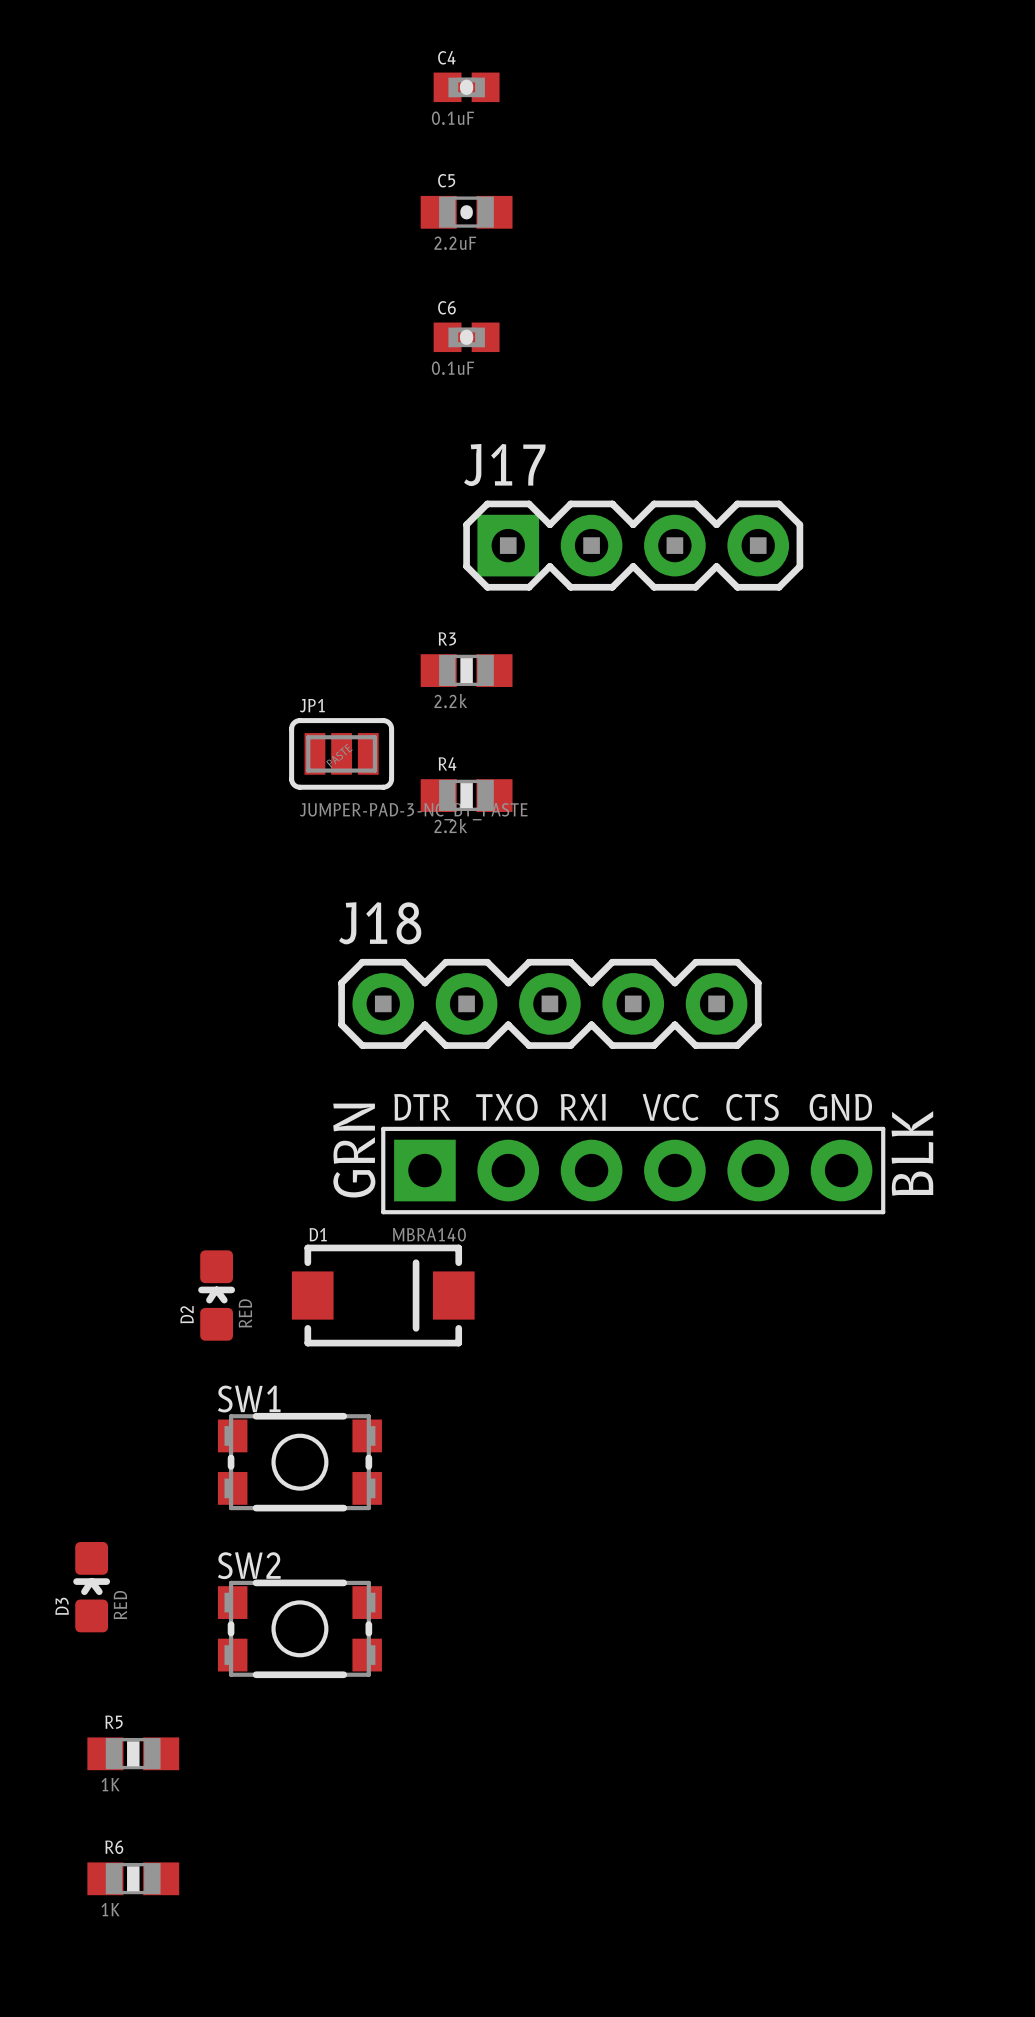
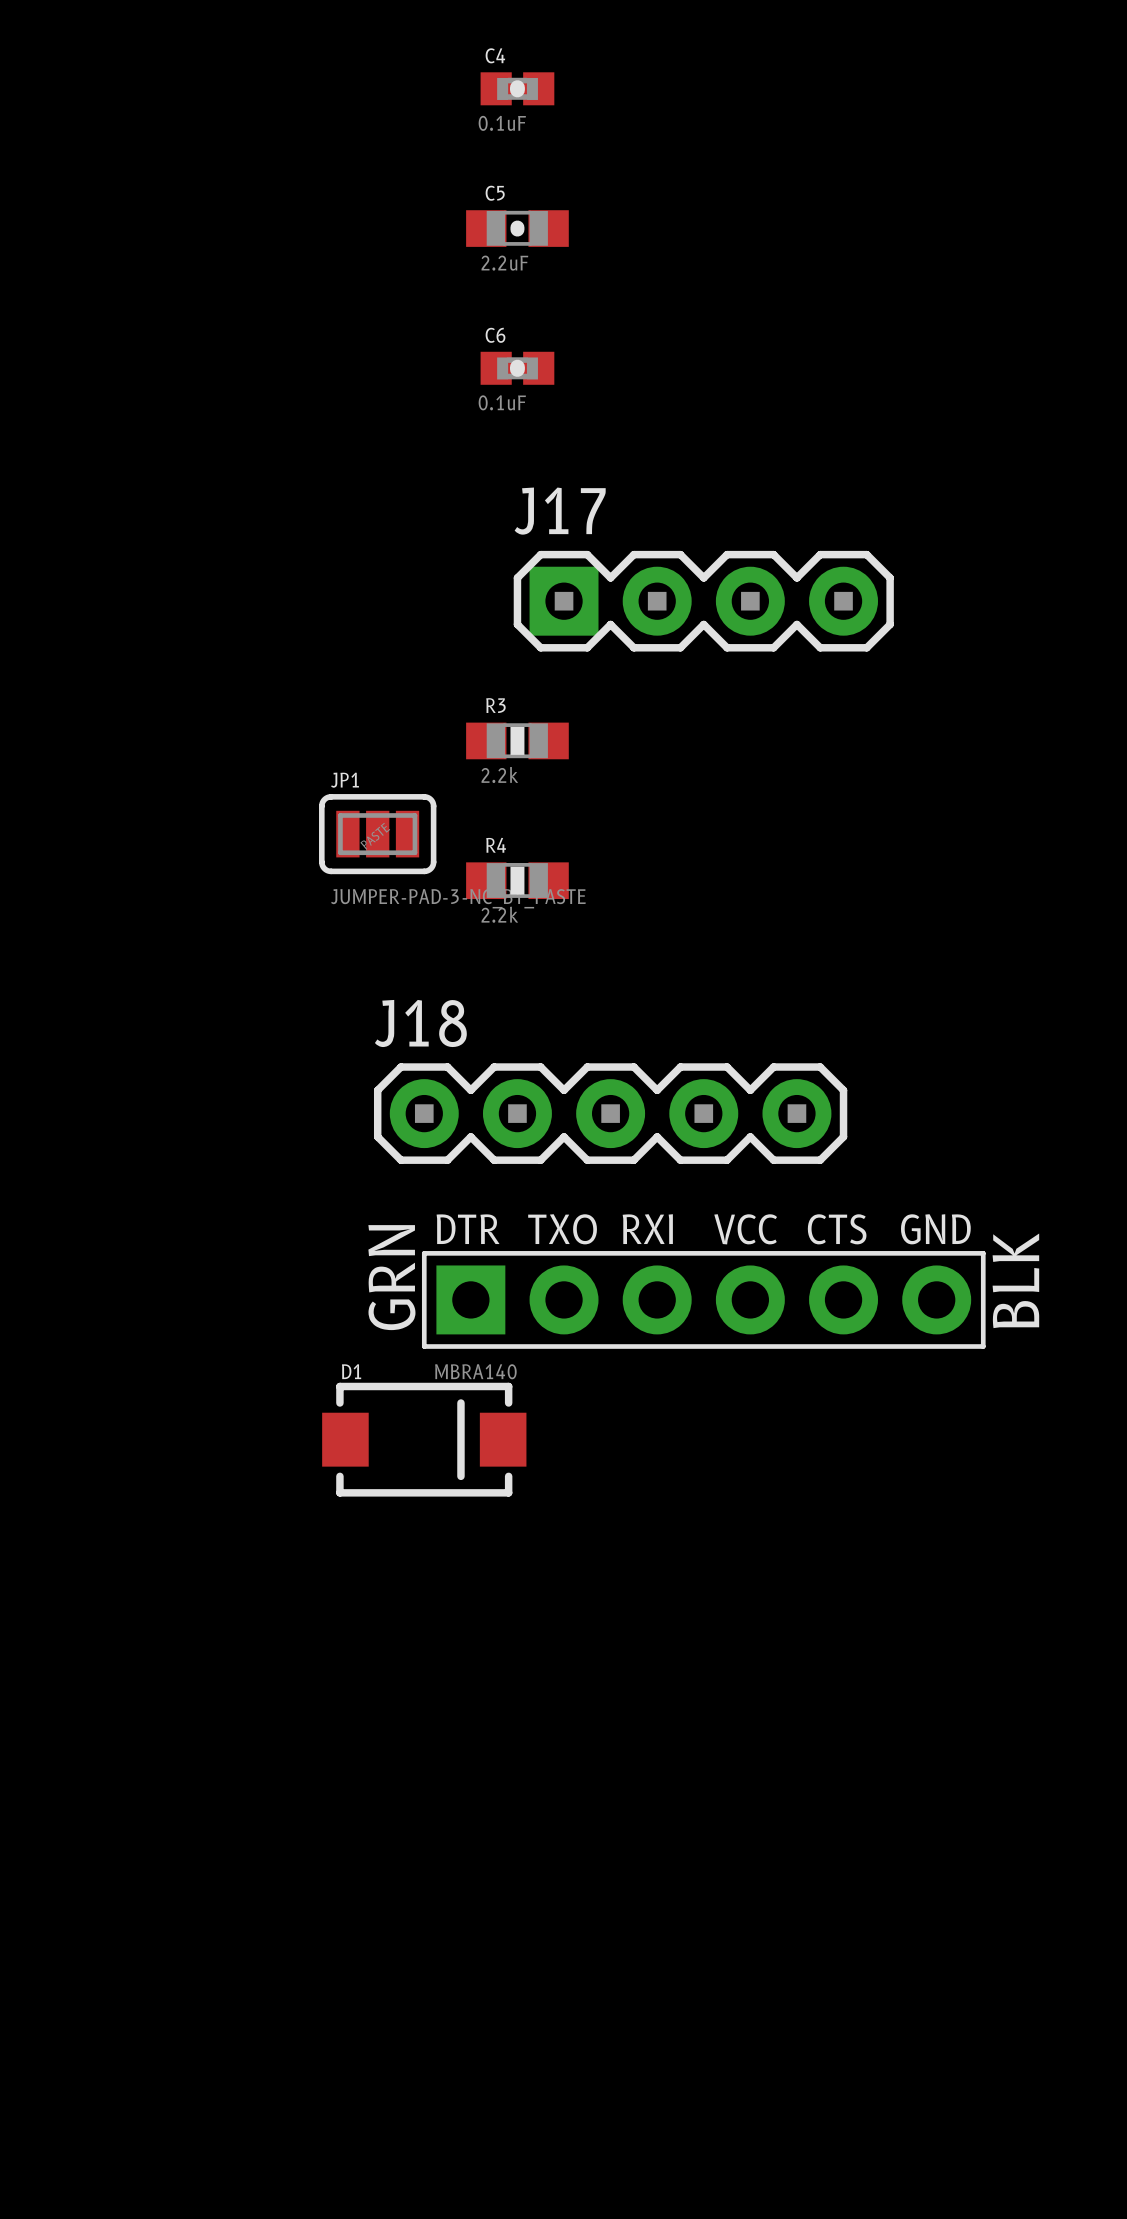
D2: RED (216, 1295) -> none
SW1: (299, 1462) -> none
D3: RED (91, 1587) -> none
SW2: (299, 1628) -> none
R5: 1K (133, 1753) -> none
R6: 1K (133, 1878) -> none

